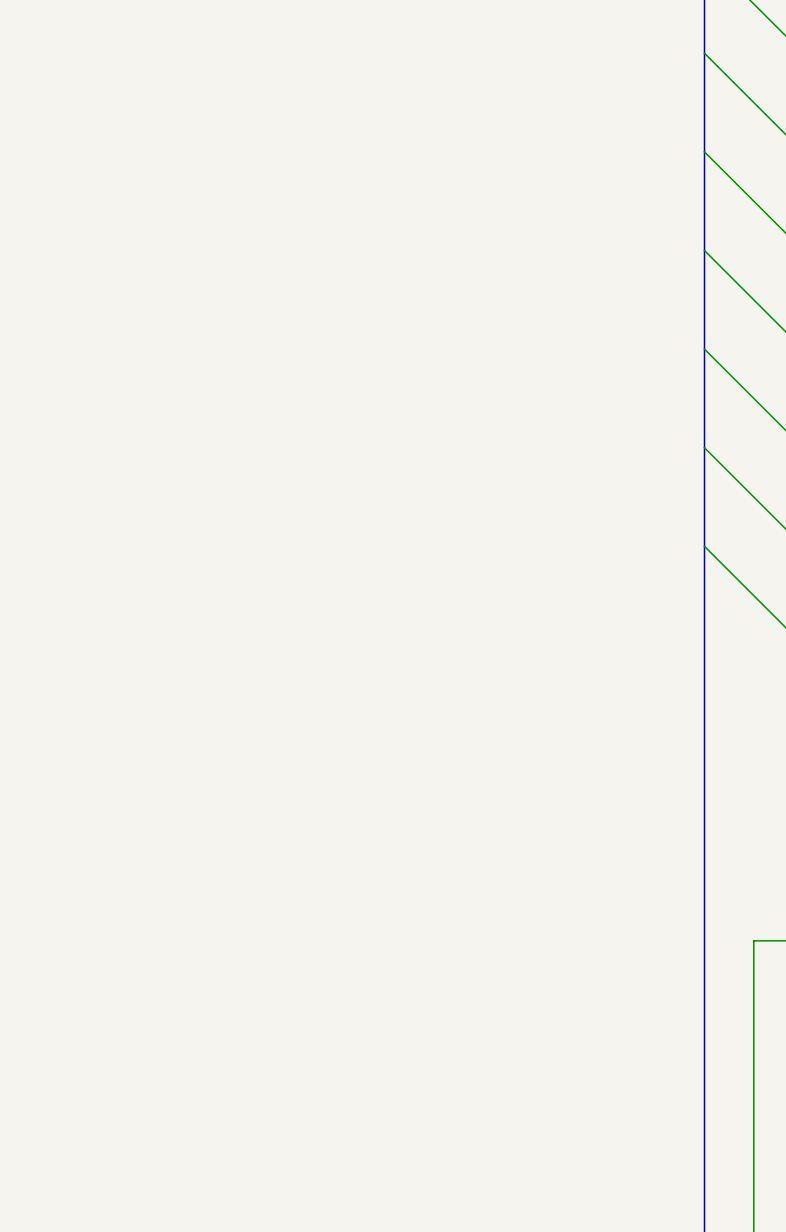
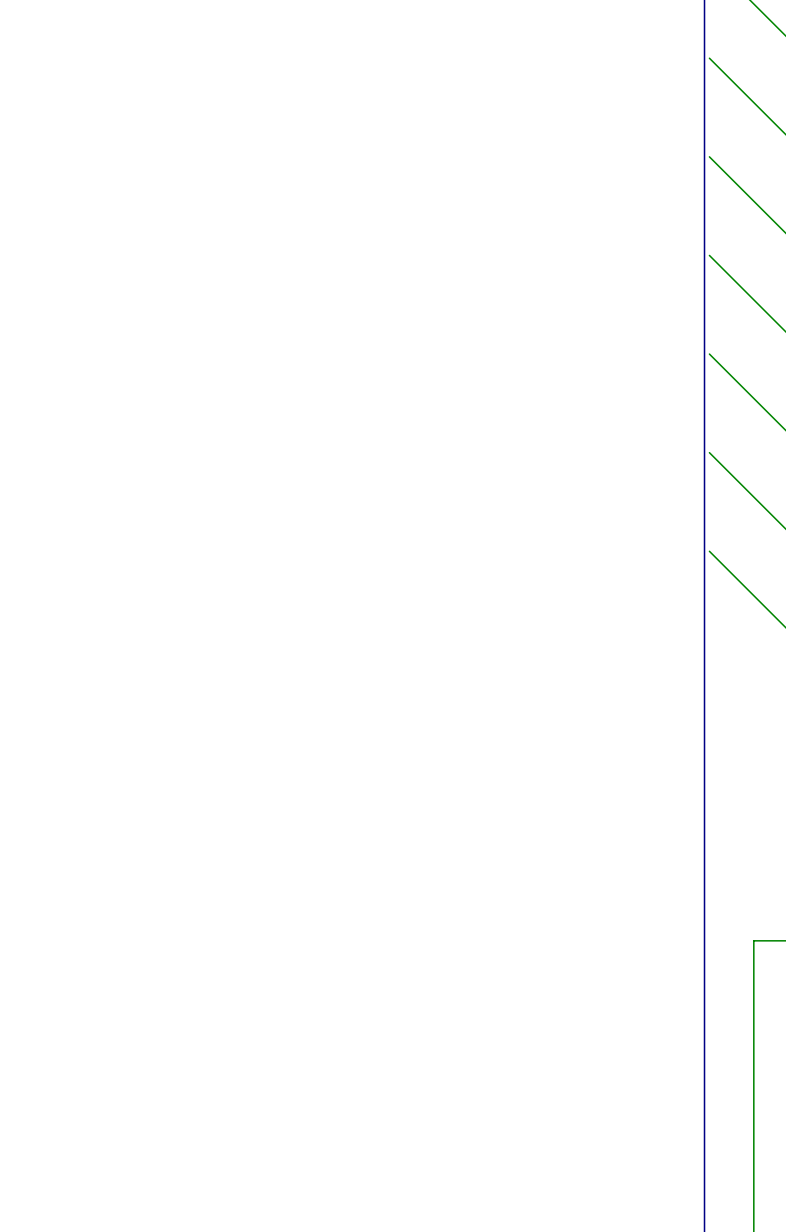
wire: (704, 53) (709, 58) -> none
wire: (704, 151) (709, 156) -> none
wire: (704, 250) (709, 255) -> none
wire: (704, 349) (709, 354) -> none
wire: (704, 447) (709, 452) -> none
wire: (704, 546) (709, 551) -> none

